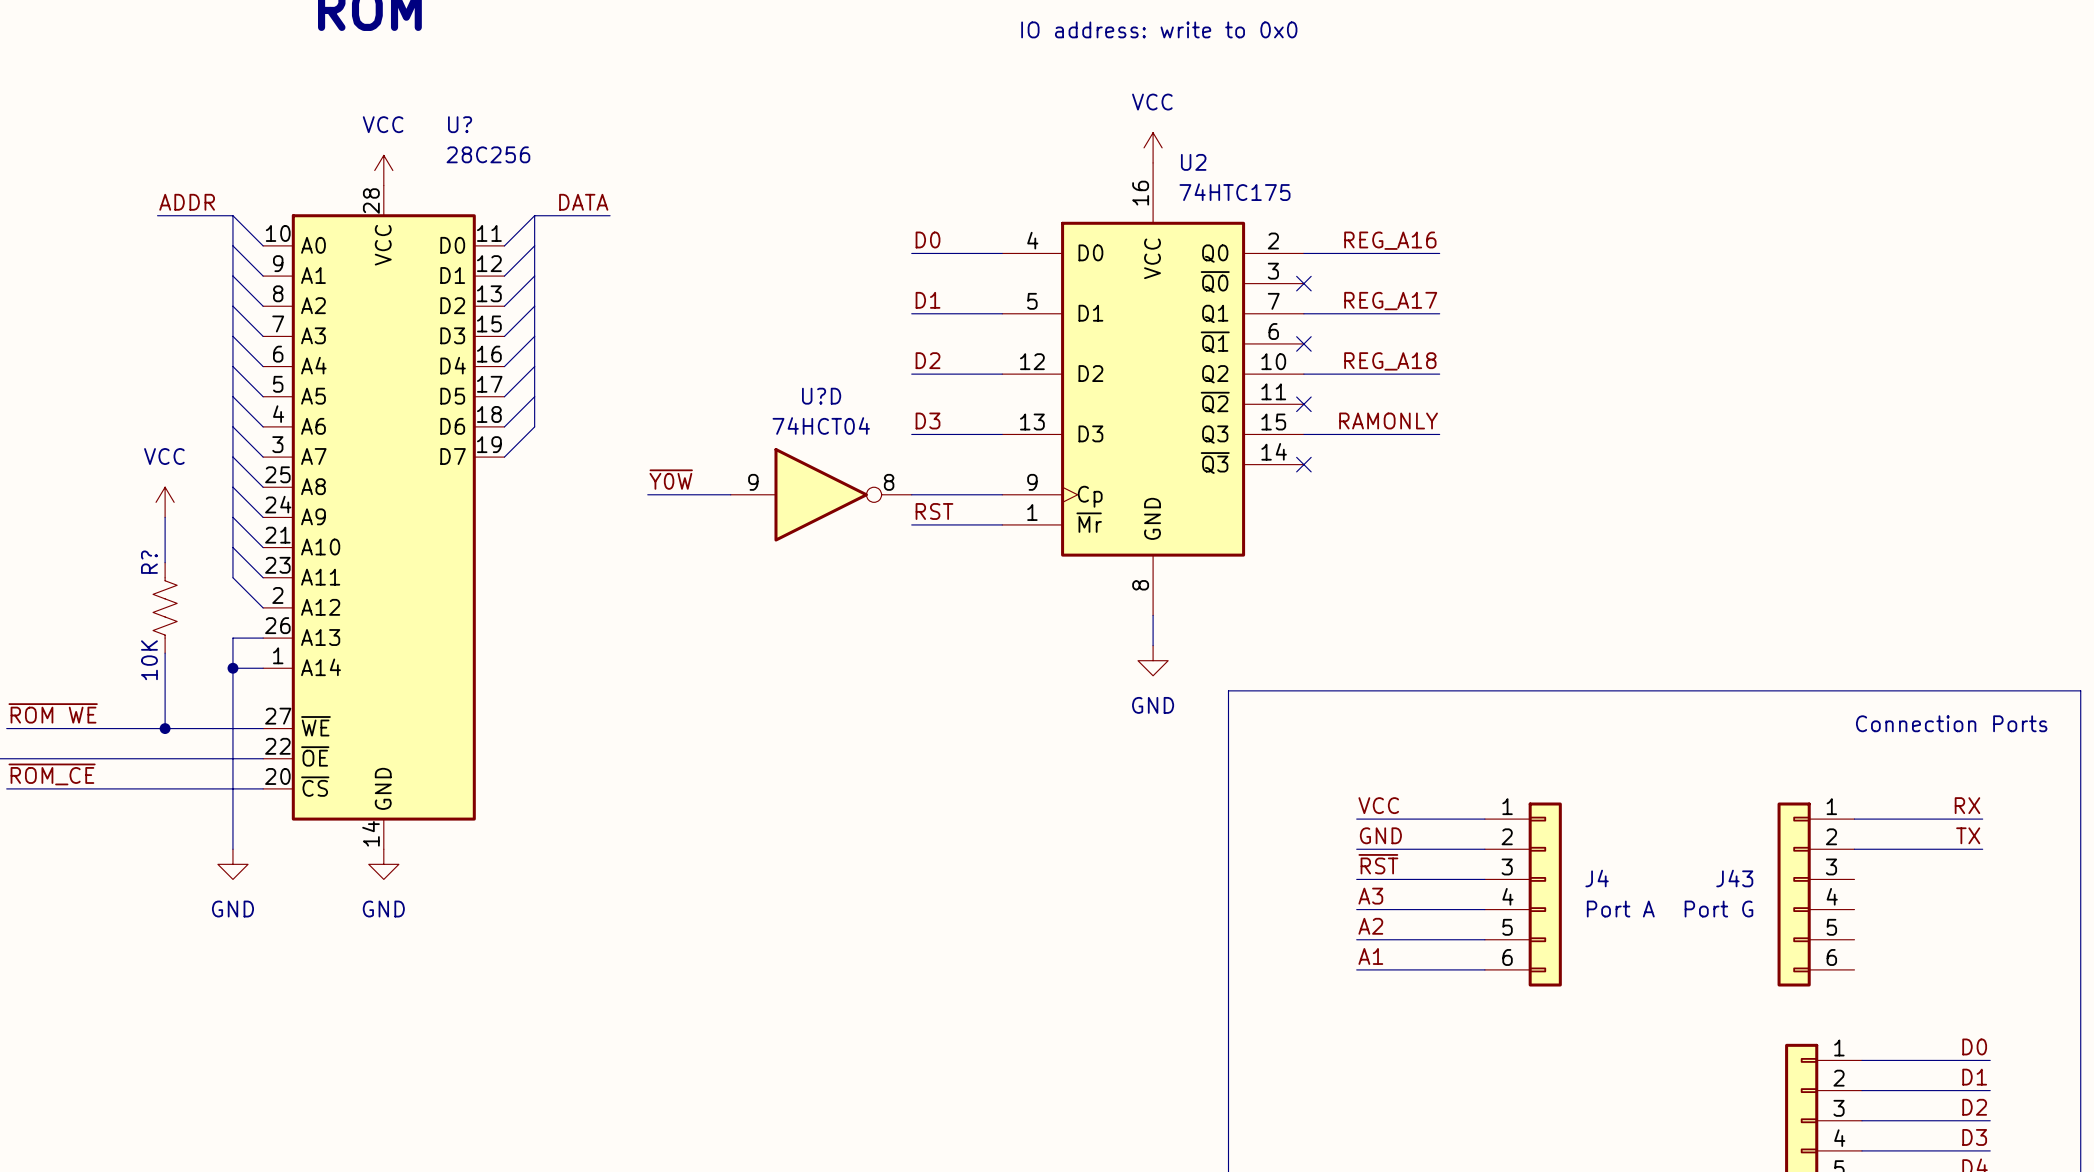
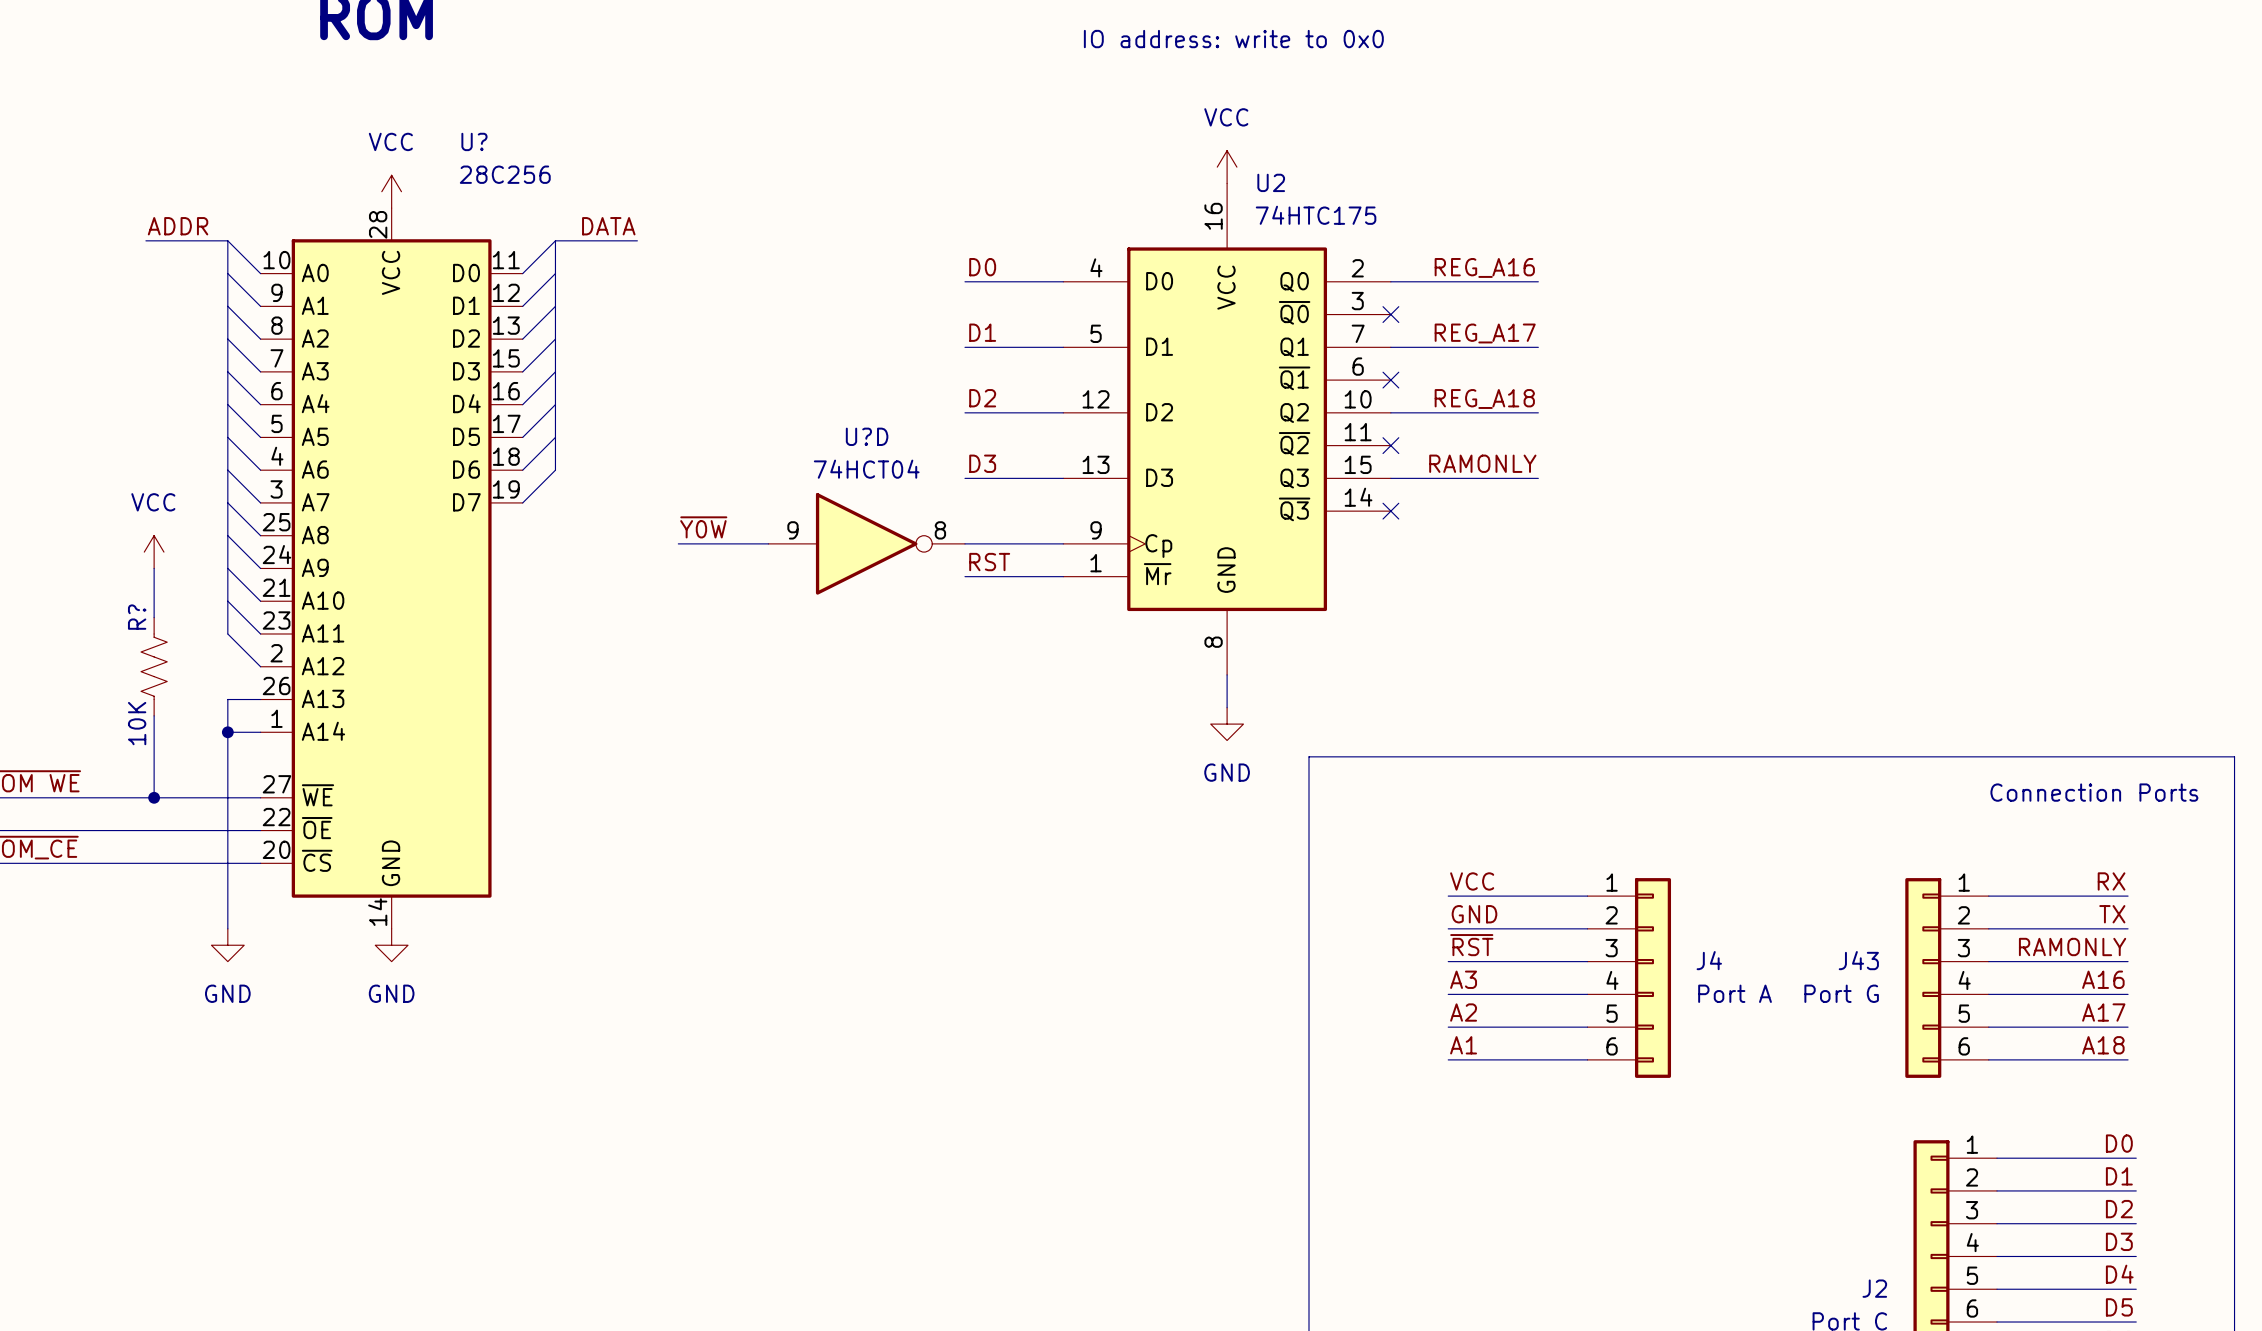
label: none -> RAMONLY (2072, 947)
wire: none -> (1988, 961) (2128, 961)
label: none -> A16 (2103, 979)
wire: none -> (1988, 994) (2128, 994)
label: none -> A17 (2103, 1012)
wire: none -> (1988, 1027) (2128, 1027)
label: none -> A18 (2103, 1045)
wire: none -> (1988, 1059) (2128, 1059)

